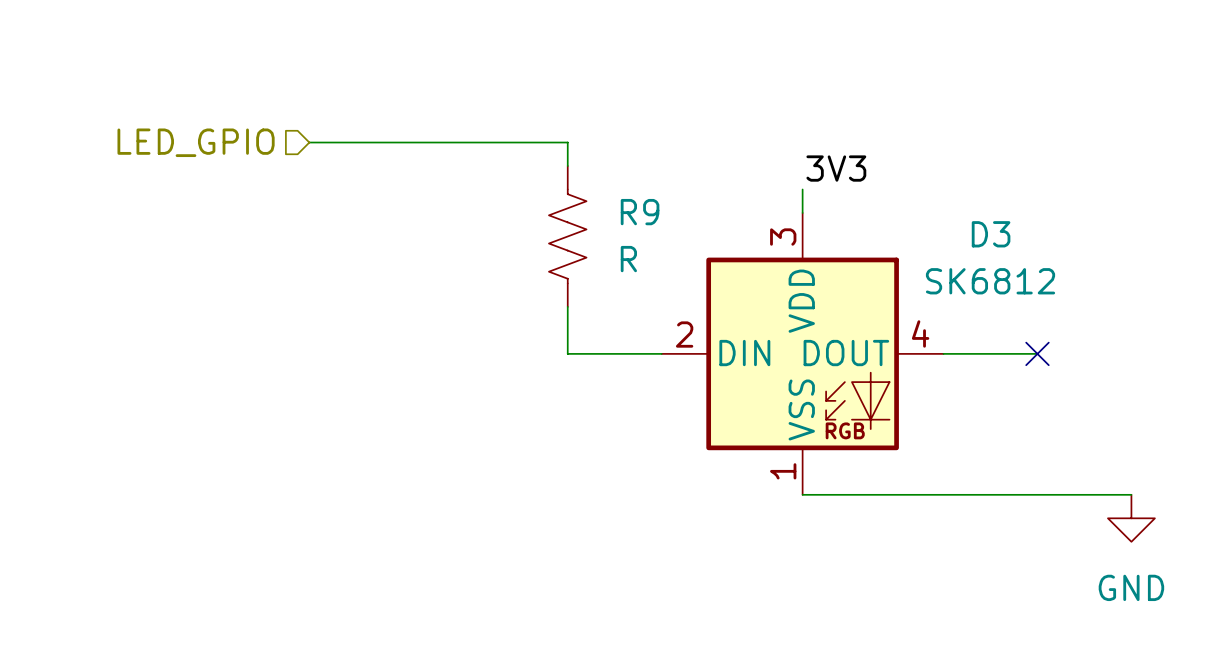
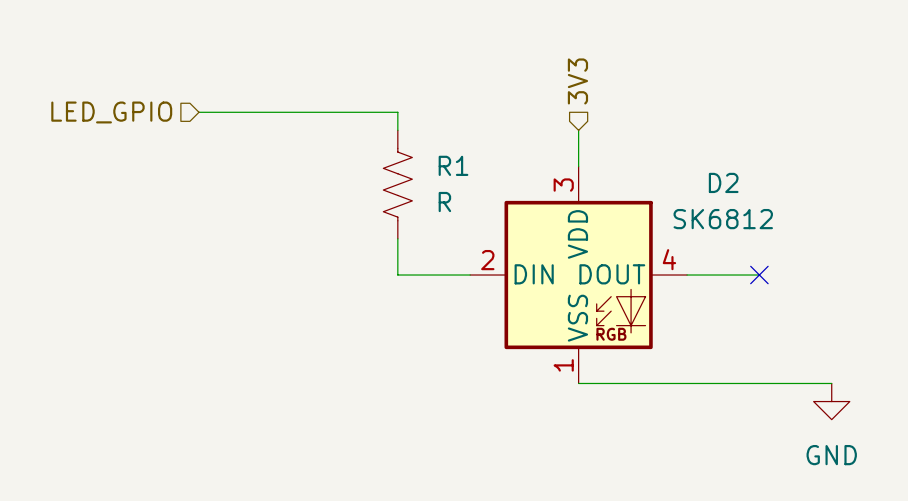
hierarchical label: none -> 3V3 (577, 81)
wire: none -> (578, 130) (578, 148)
label: 3V3 (836, 168) -> none
R9 name: R9 (640, 212) -> R1 (453, 165)
D3 name: D3 (991, 234) -> D2 (723, 182)

